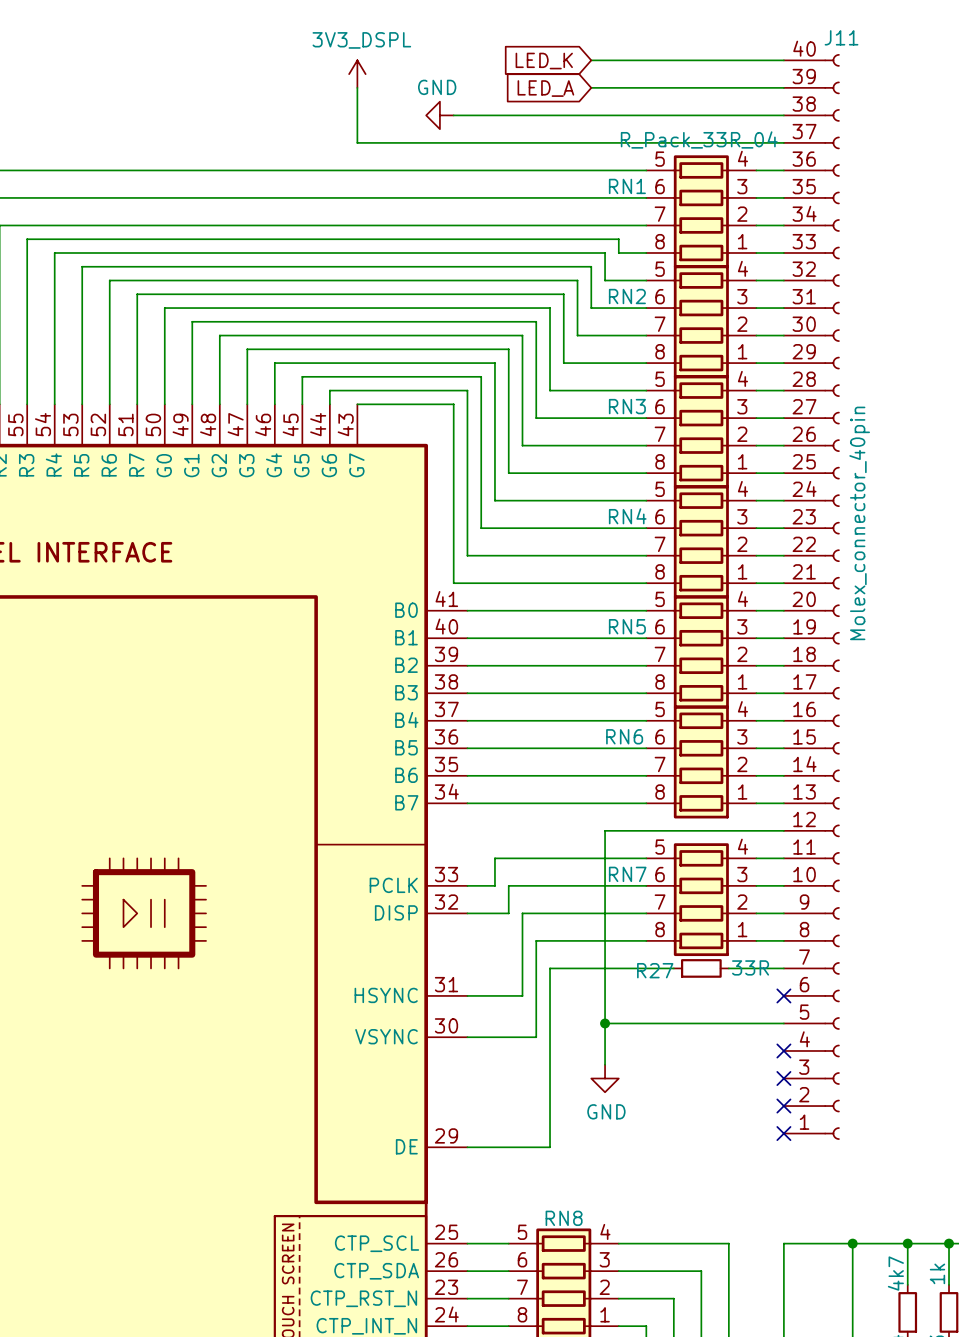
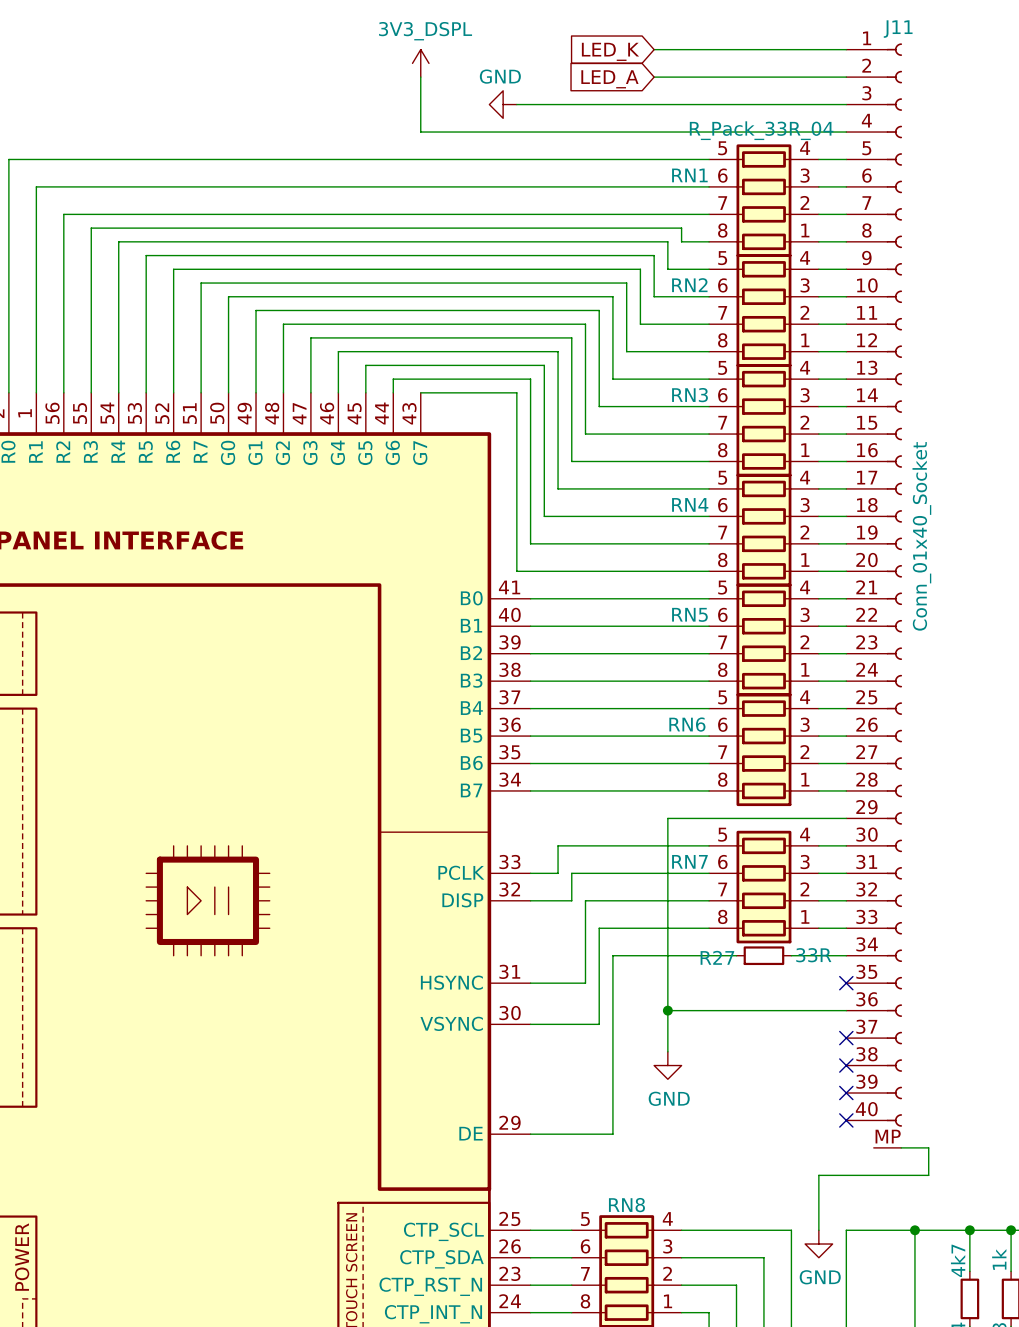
J11 symbol: [783, 54, 840, 1140] -> [846, 43, 903, 1148]
J11 value: Molex_connector_40pin (859, 523) -> Conn_01x40_Socket (921, 536)
wire: none -> (901, 1147) (928, 1147) (928, 1175) (818, 1175) (818, 1230)
power symbol: none -> GND (818, 1244)

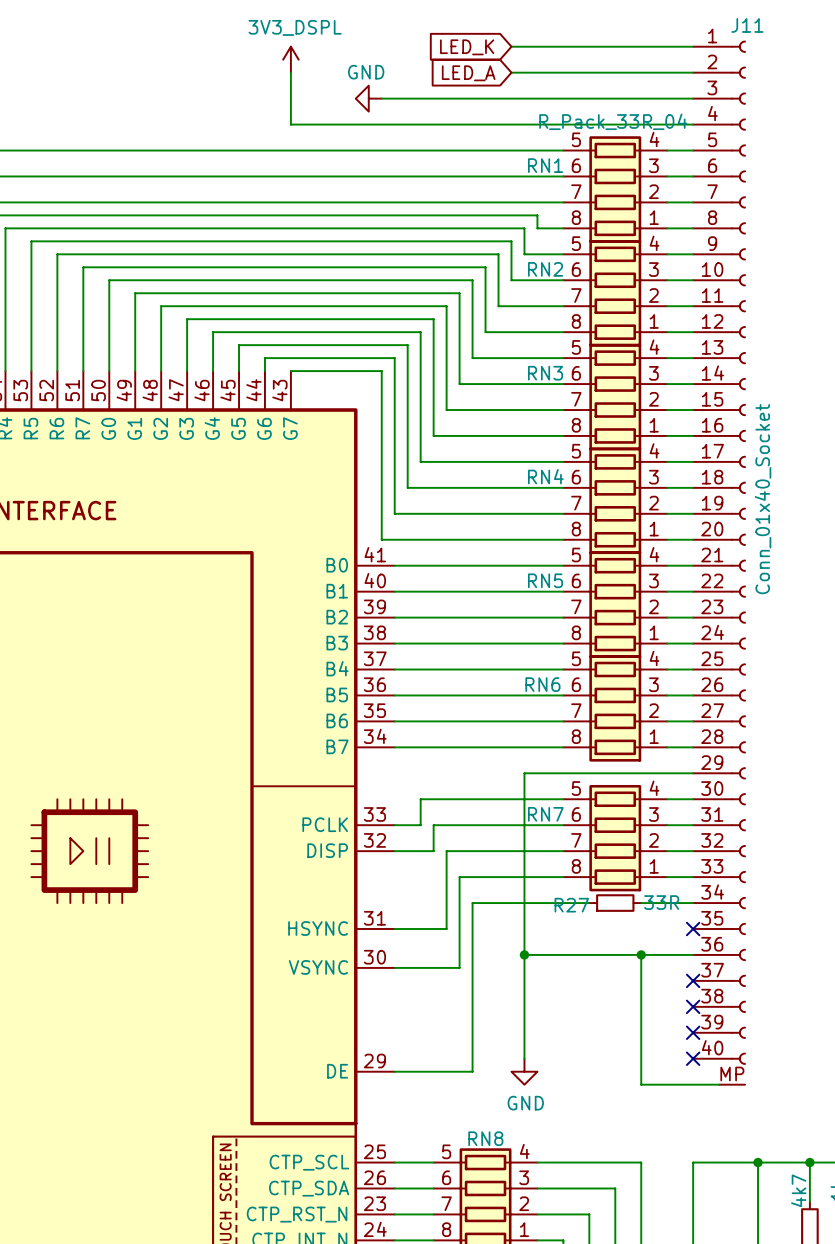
wire: none -> (641, 954) (641, 1084) (719, 1084)
junction: none -> (641, 954)
wire: none -> (524, 993) (524, 1058)
power symbol position: GND (667, 1065) -> GND (524, 1071)
wire: (901, 1147) (928, 1147) (928, 1175) (818, 1175) (818, 1230) -> none
power symbol: GND (818, 1244) -> none

